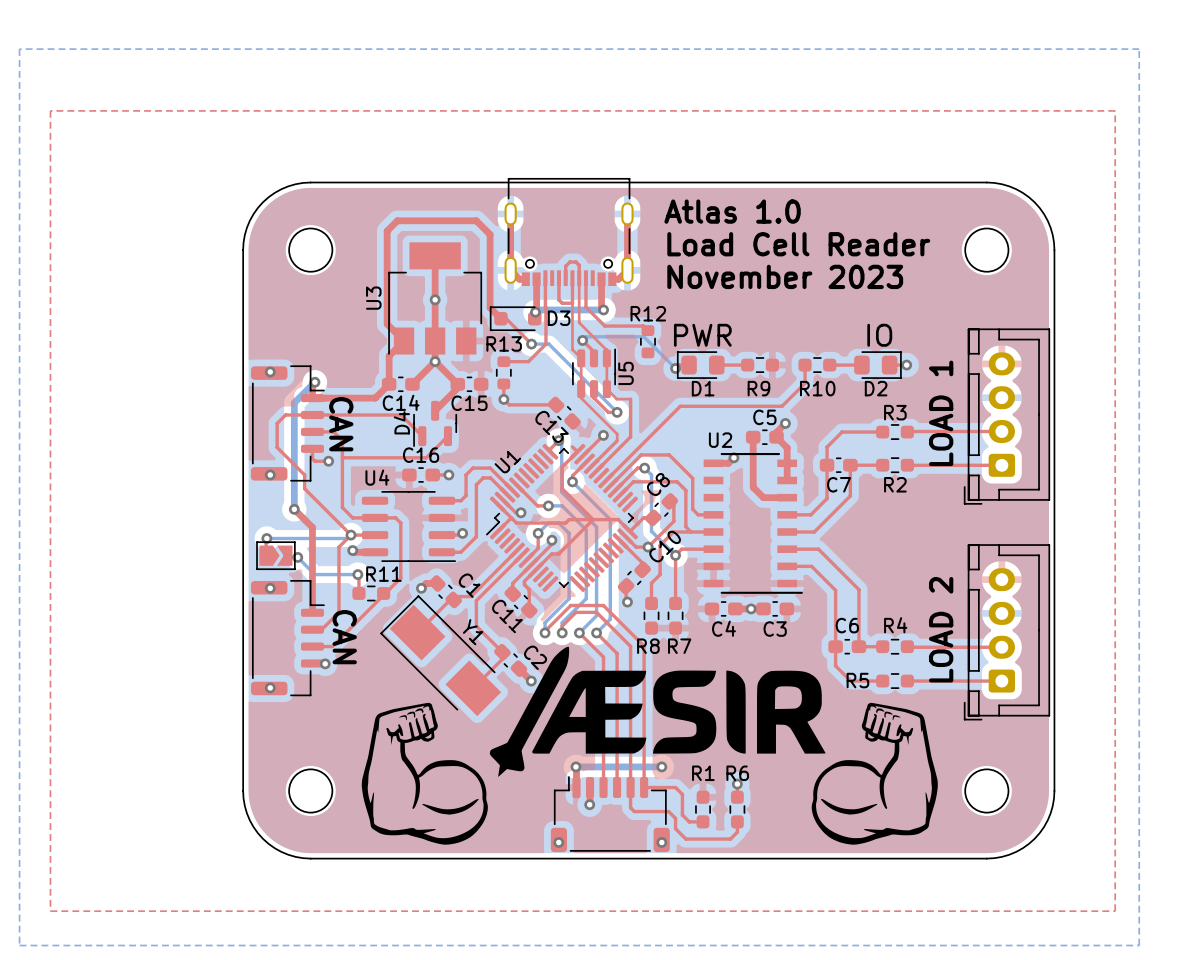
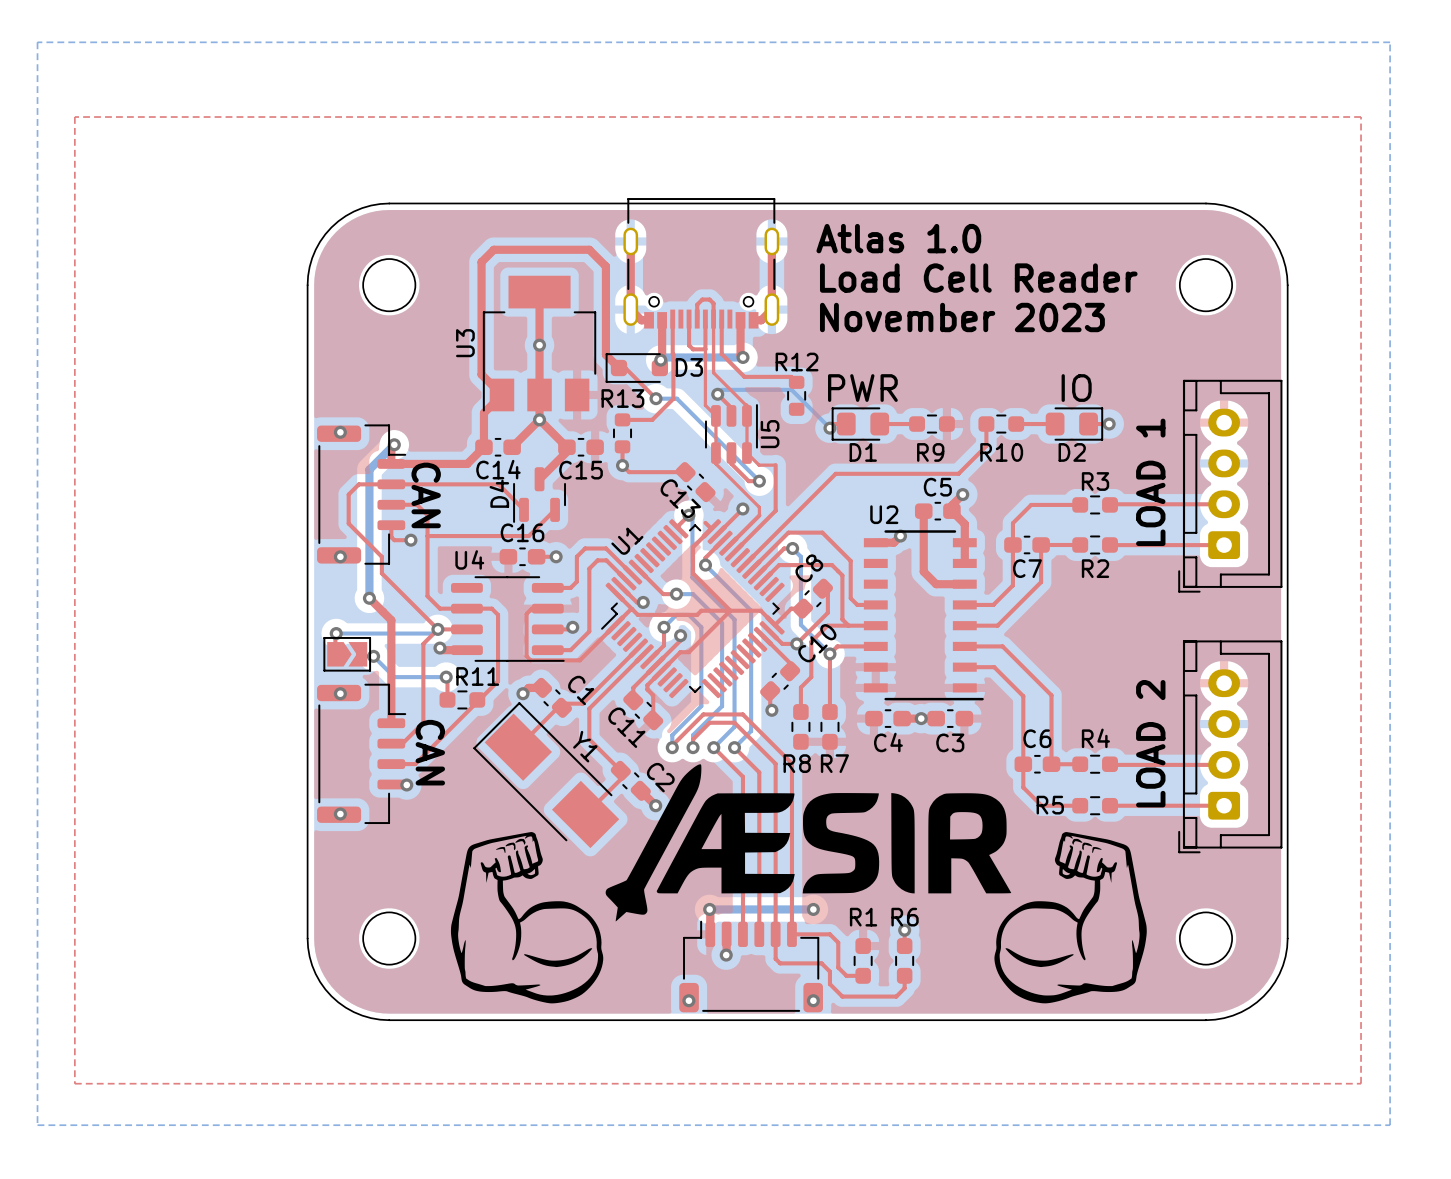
top track: none -> (547, 608) (531, 608) (526, 613) (526, 656) (530, 660) (579, 660) (615, 624)

